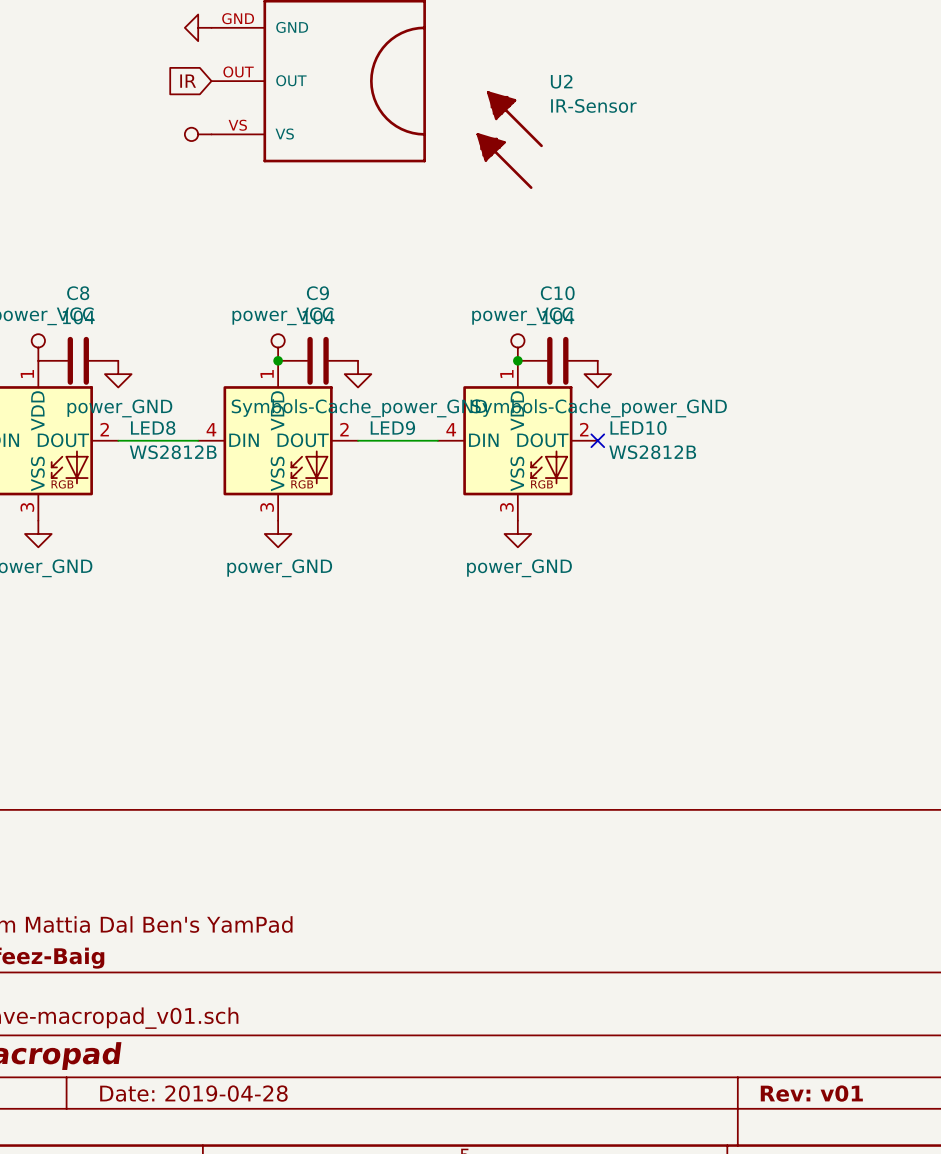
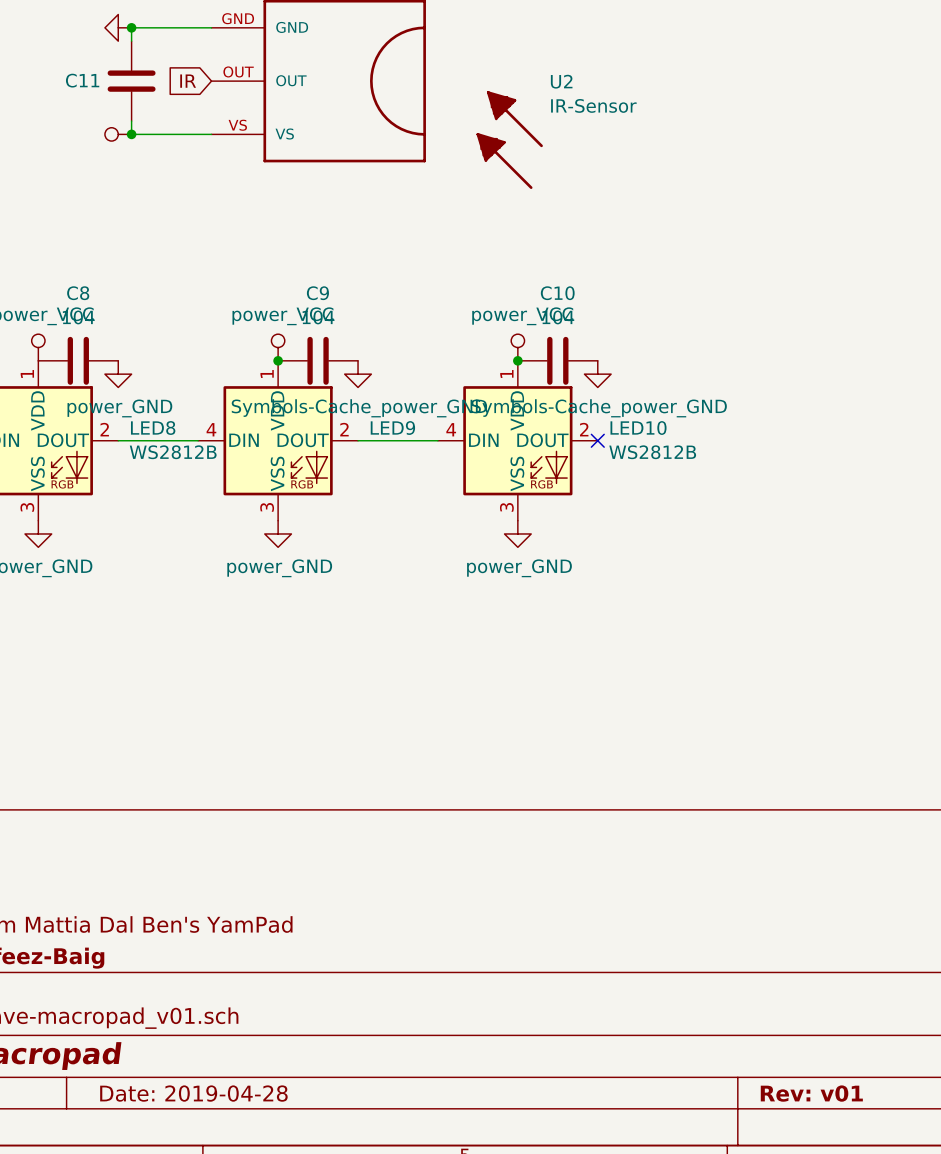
junction: none -> (131, 27)
power symbol position: (198, 27) -> (118, 27)
wire: none -> (211, 27) (131, 27) (131, 41)
C11: none -> (131, 81)
wire: none -> (131, 121) (131, 134) (211, 134)
junction: none -> (131, 134)
power symbol position: (198, 134) -> (118, 134)

